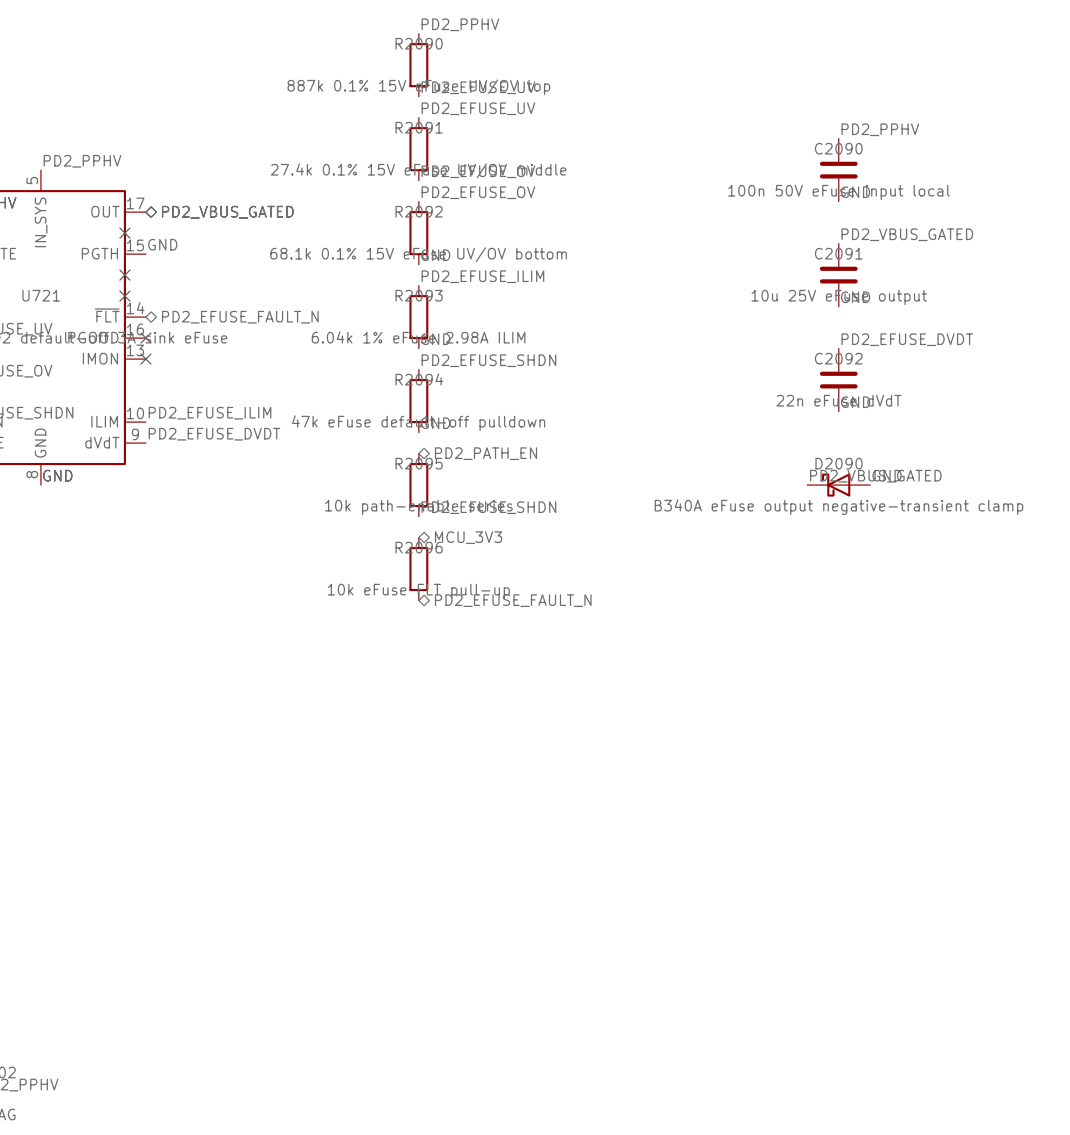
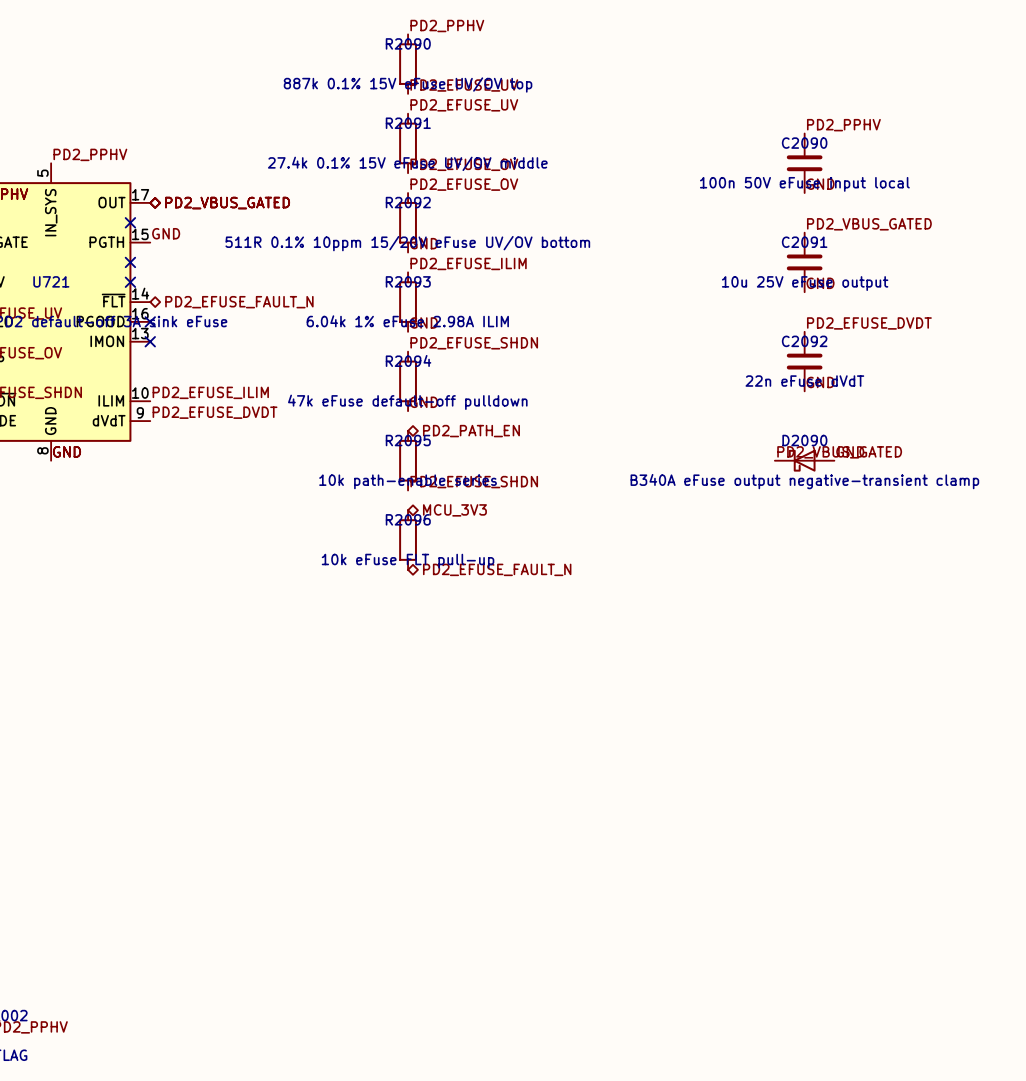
R2092 value: 68.1k 0.1% 15V eFuse UV/OV bottom (418, 254) -> 511R 0.1% 10ppm 15/20V eFuse UV/OV bottom (407, 243)

